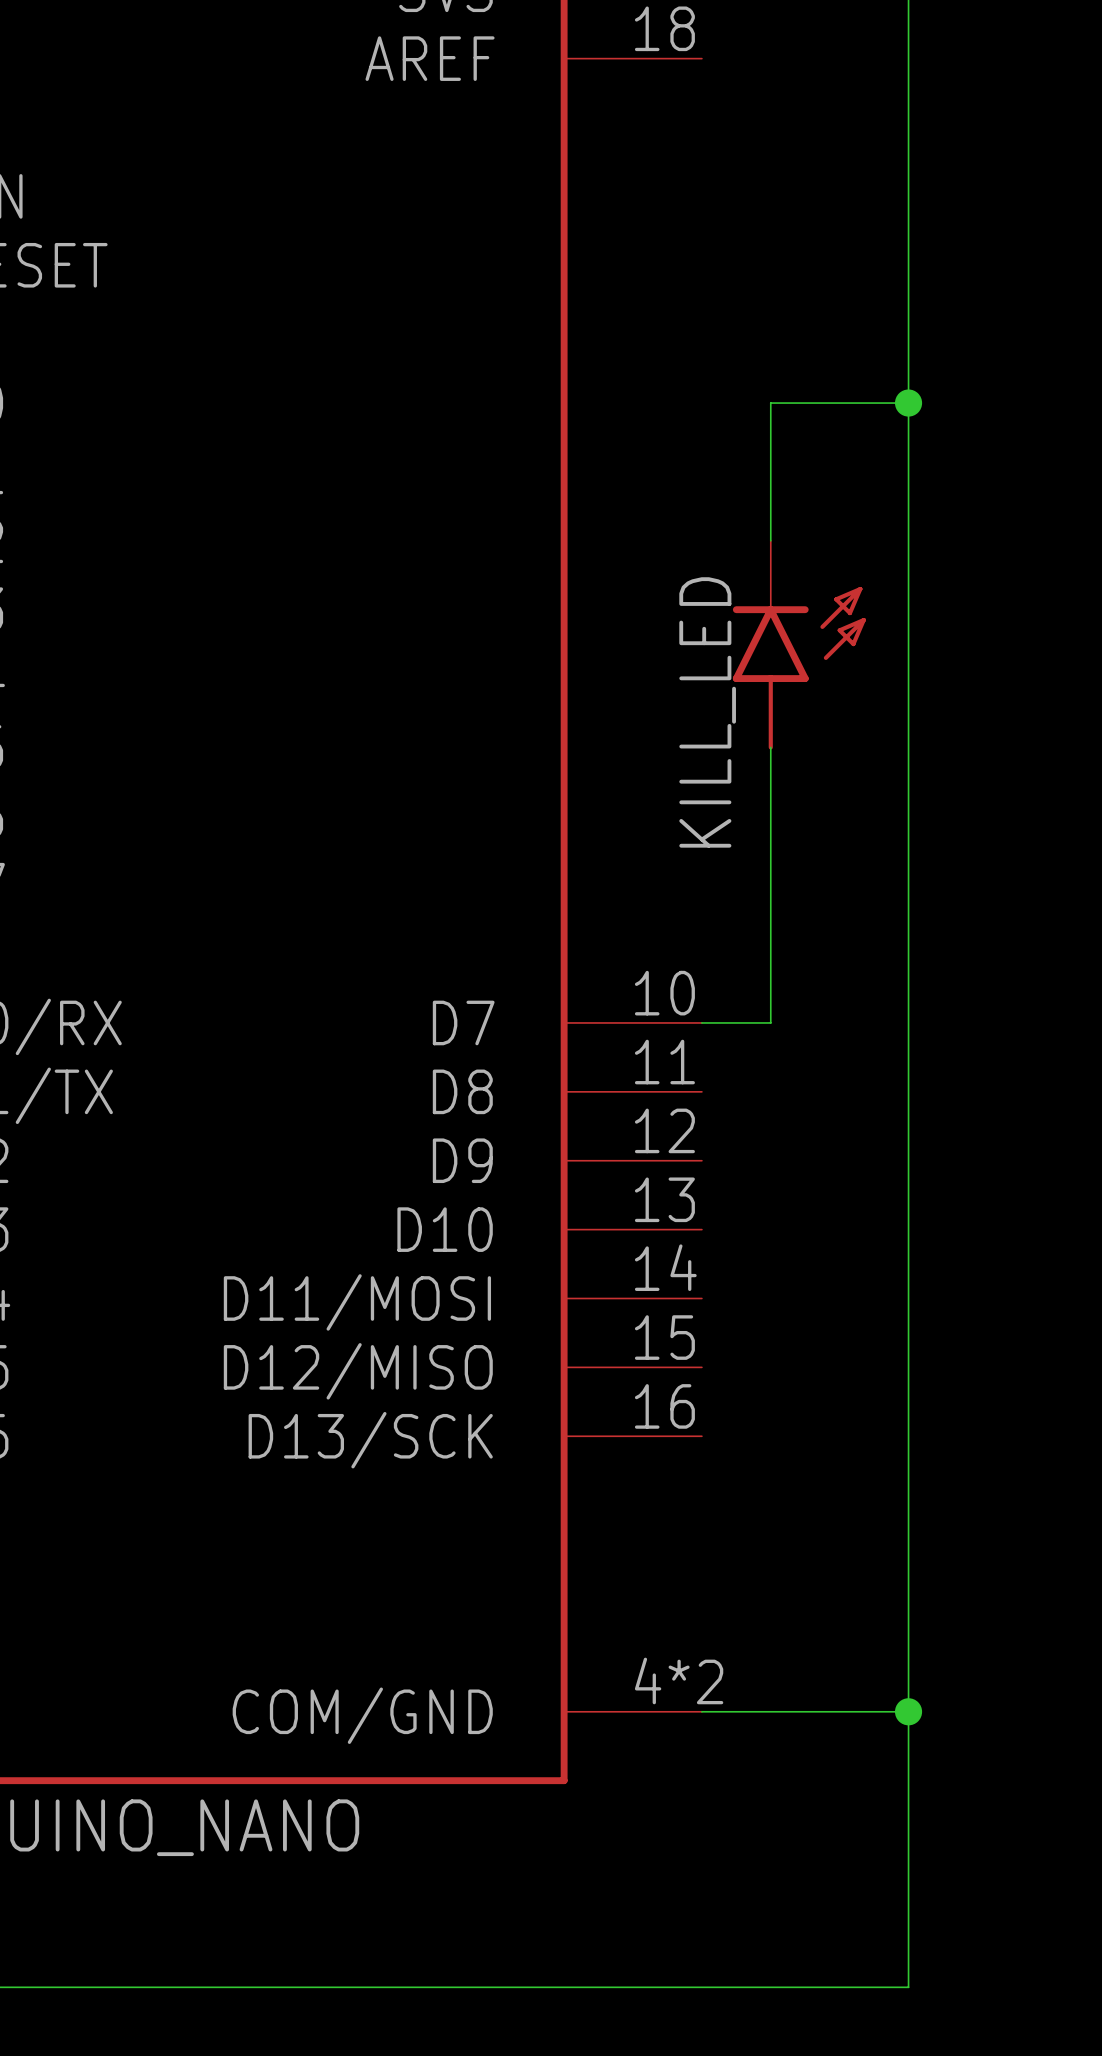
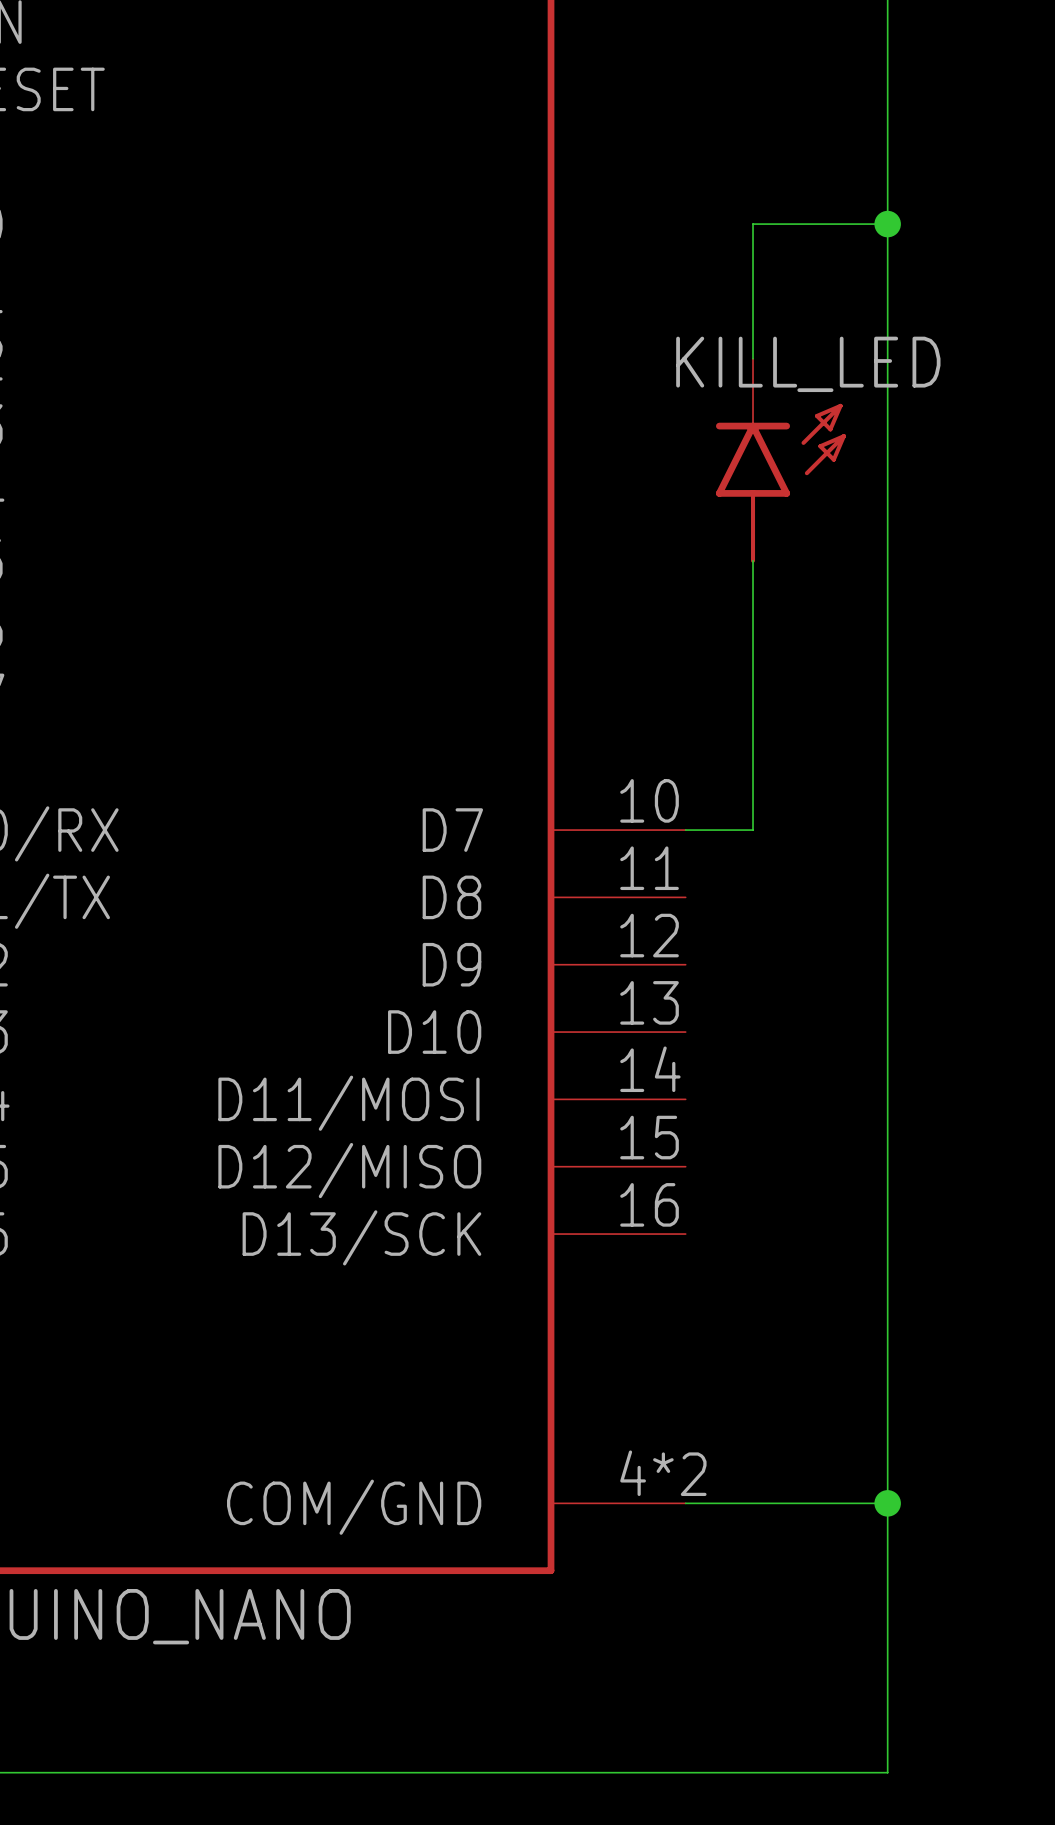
KILL_LED name rotation: 0° (707, 712) -> 90° clockwise (808, 364)

